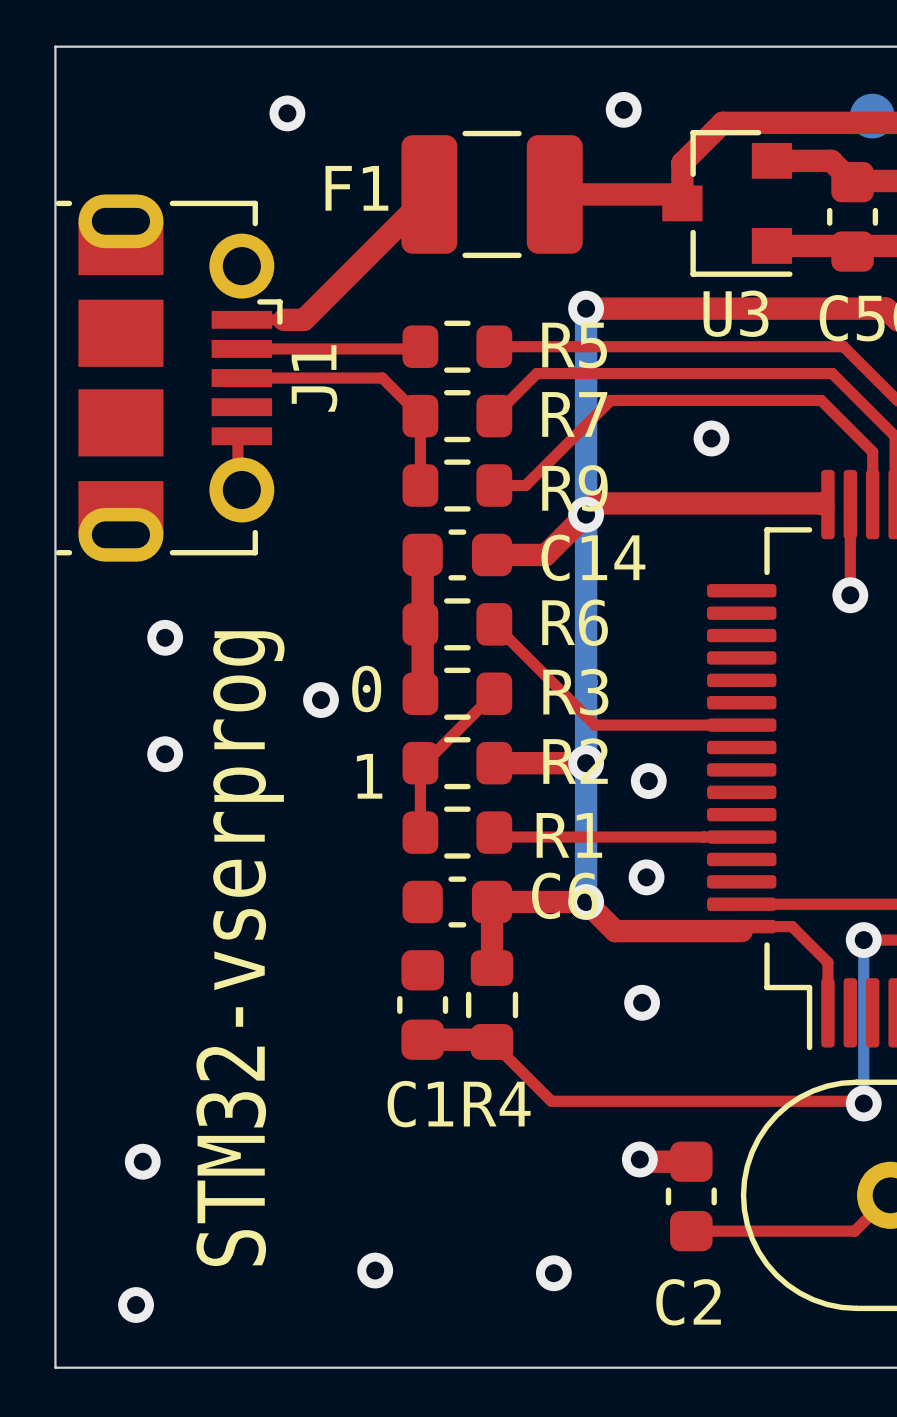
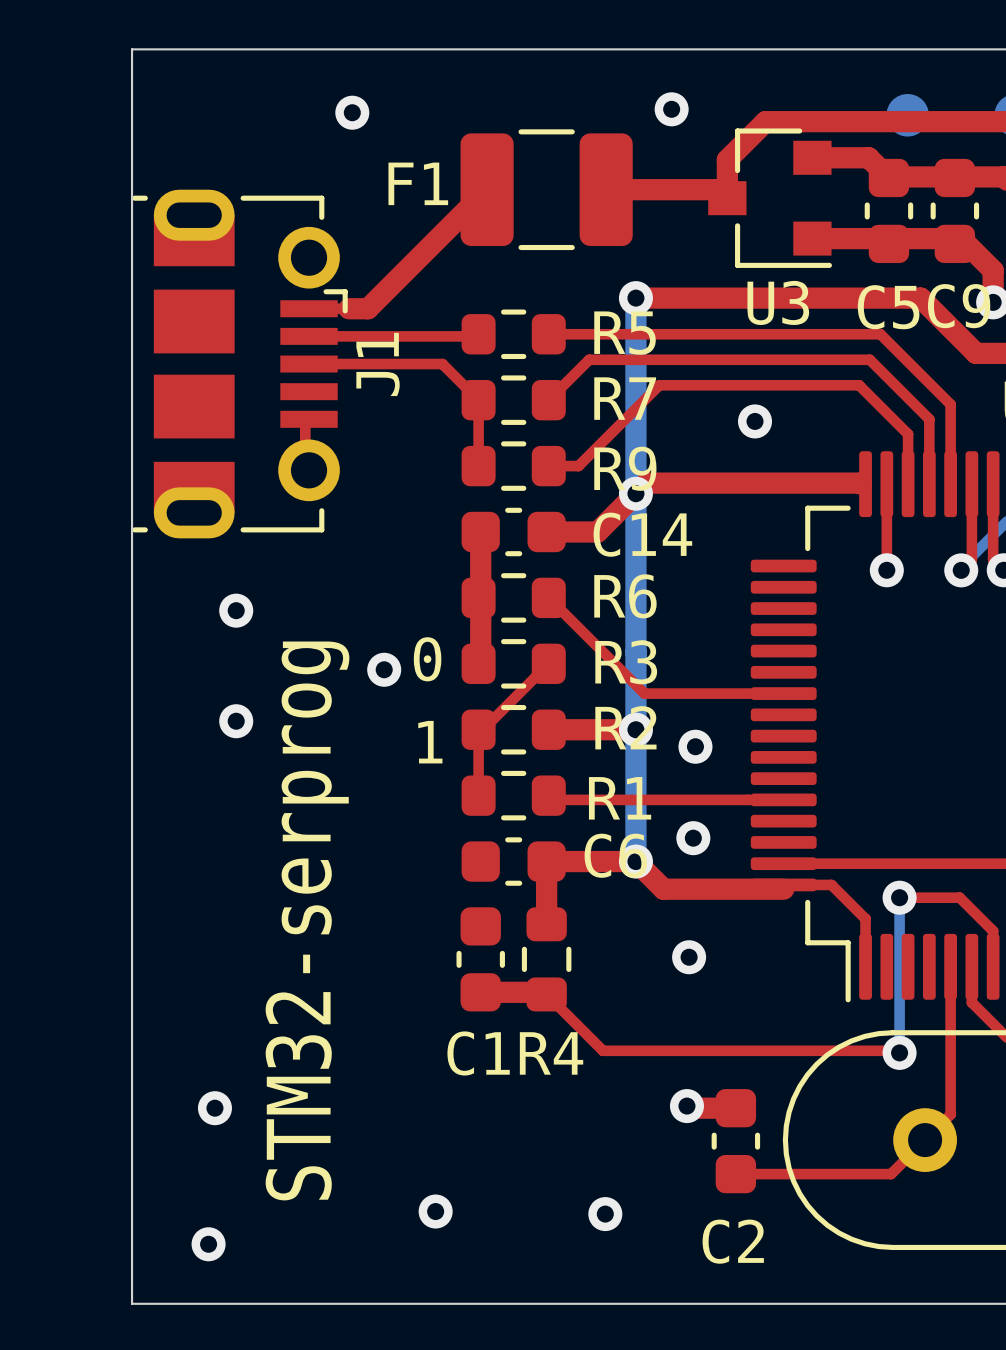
text: STM32-vserprog (240, 948) -> STM32-serprog (307, 920)

